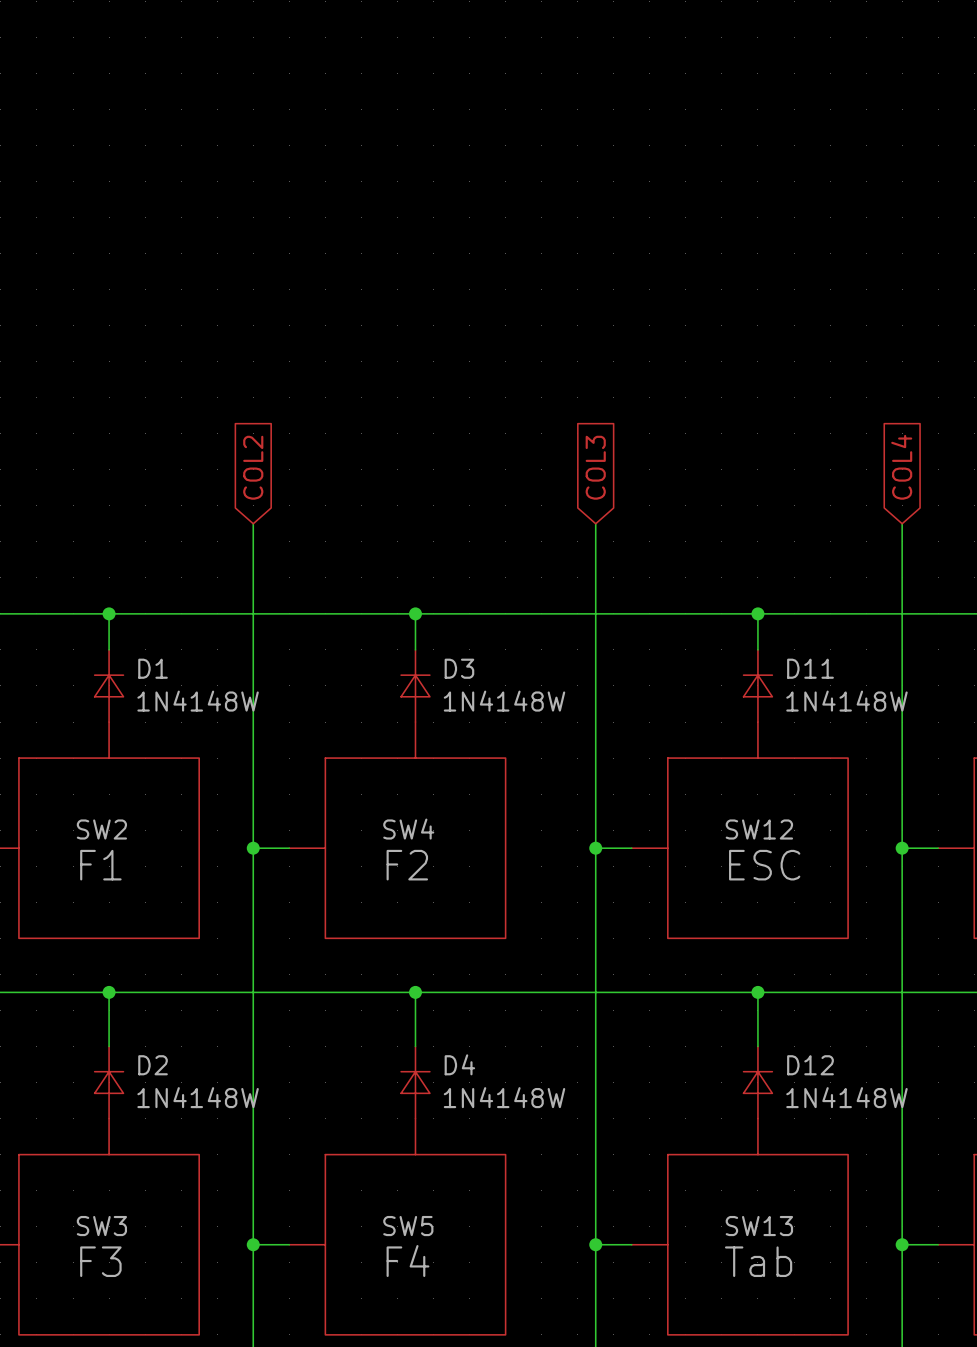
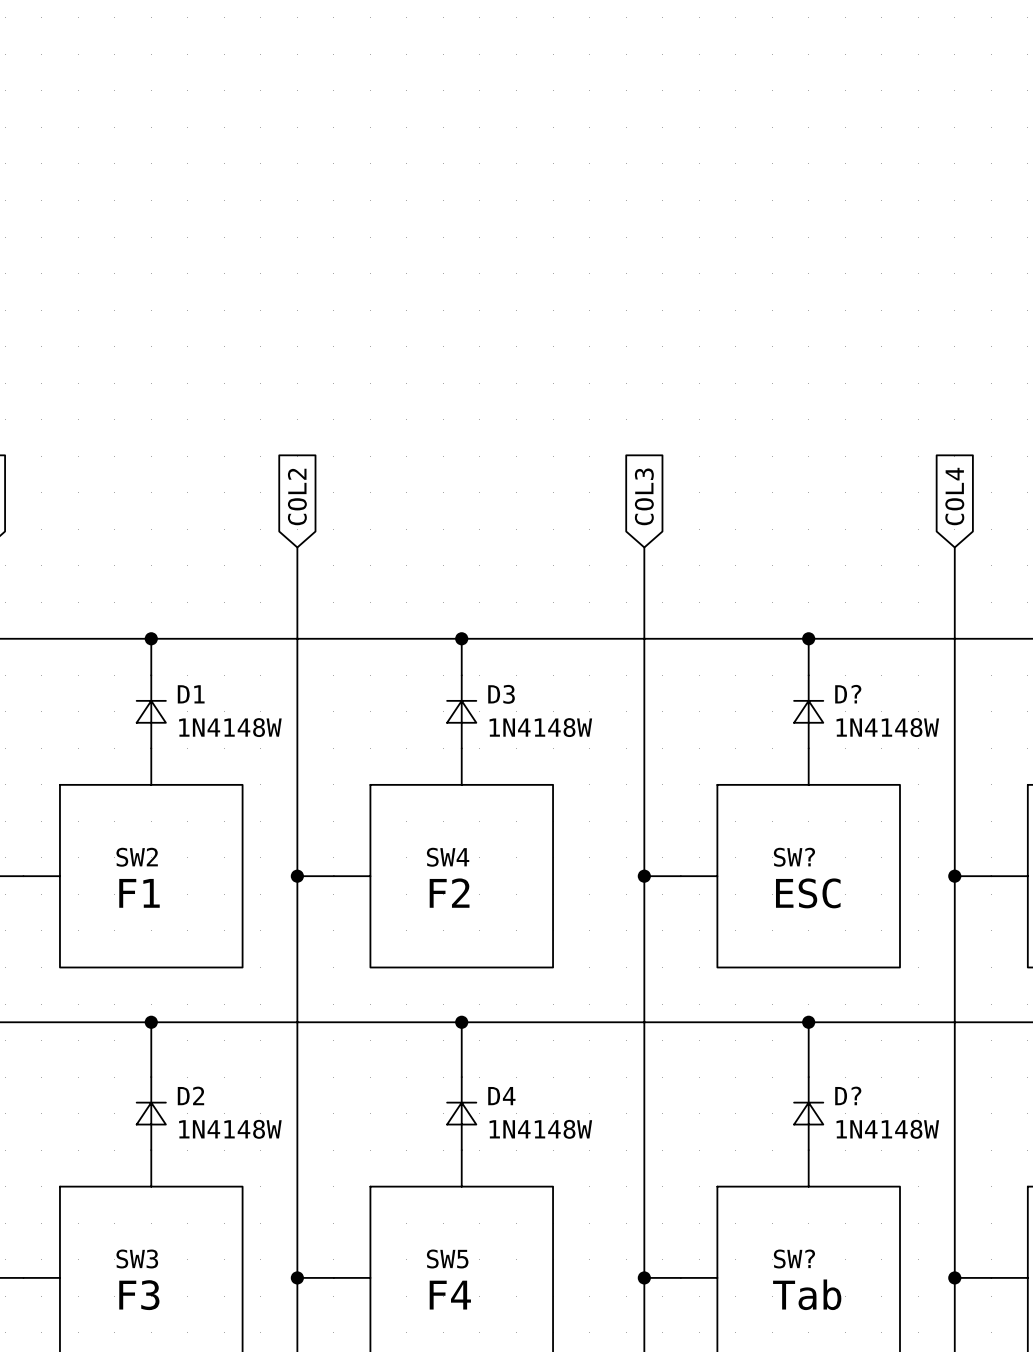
D11 name: D11 (810, 668) -> D? (848, 694)
SW12 name: SW12 (759, 829) -> SW? (794, 857)
D12 name: D12 (810, 1065) -> D? (848, 1095)
SW13 name: SW13 (759, 1226) -> SW? (794, 1259)

